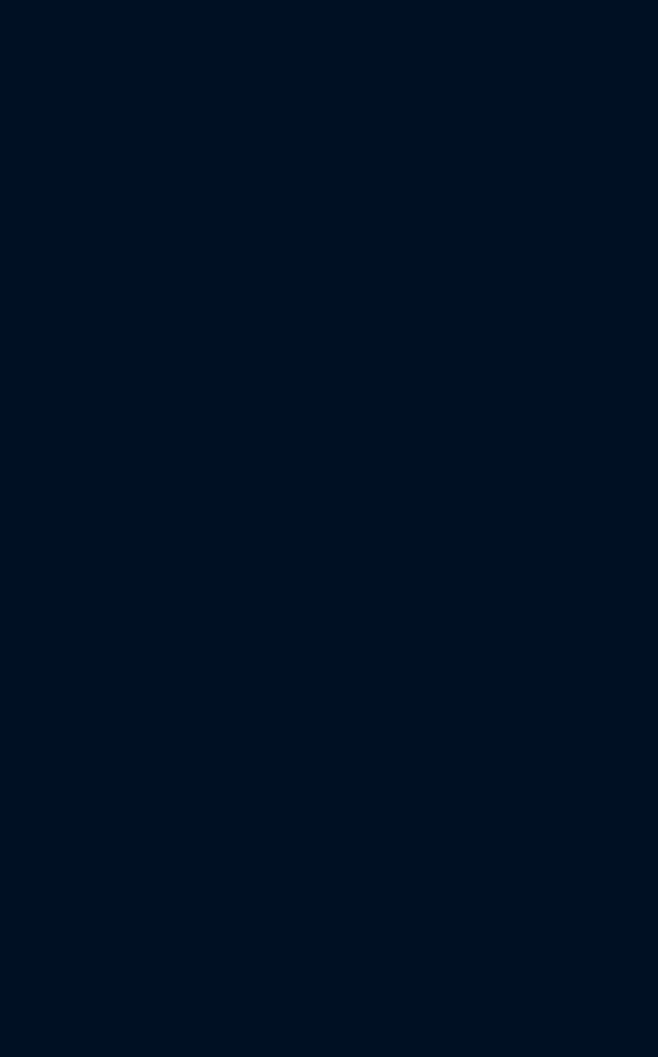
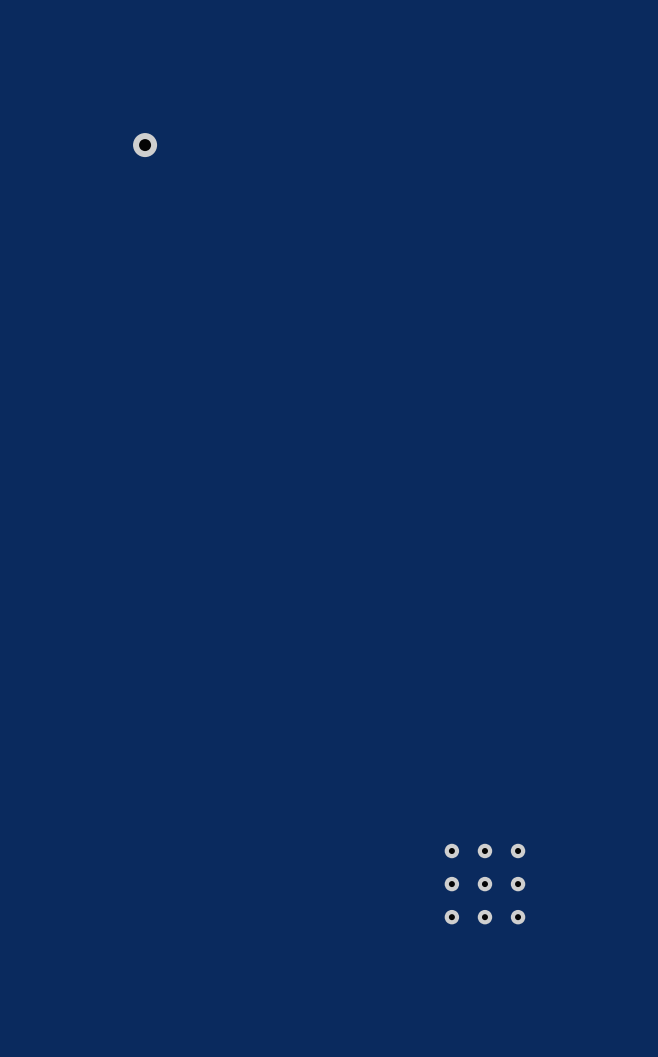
part: none -> (145, 145)
part: none -> (484, 884)

